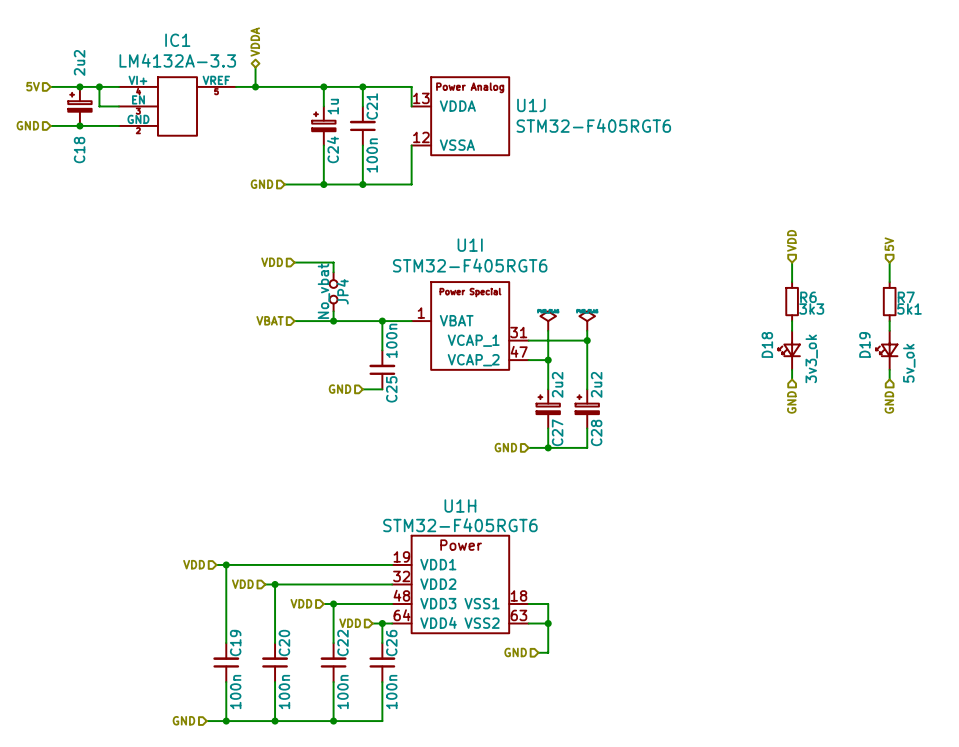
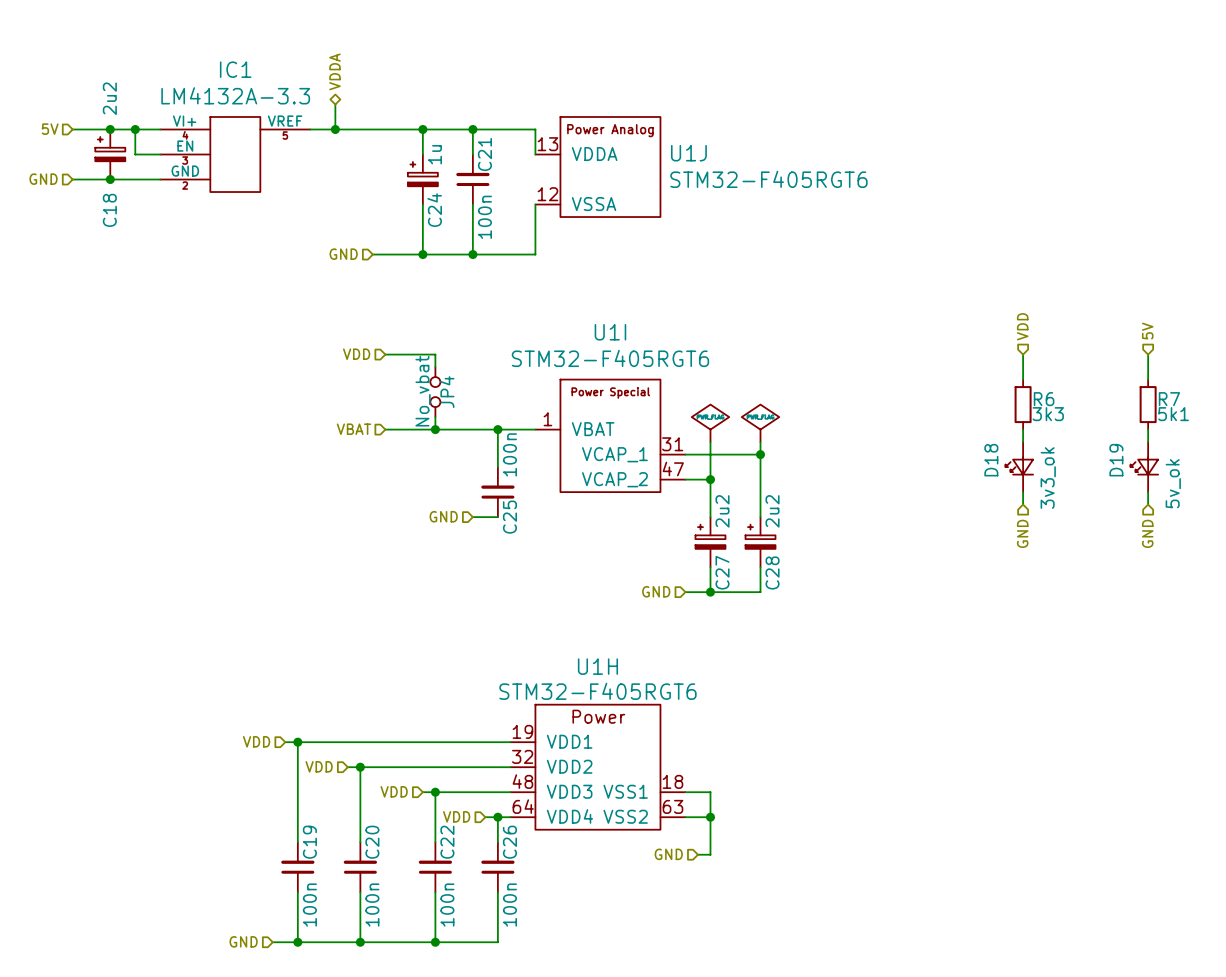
power symbol shape: [540, 311, 557, 331] -> [691, 404, 730, 443]
power symbol shape: [579, 311, 596, 331] -> [741, 404, 780, 443]

